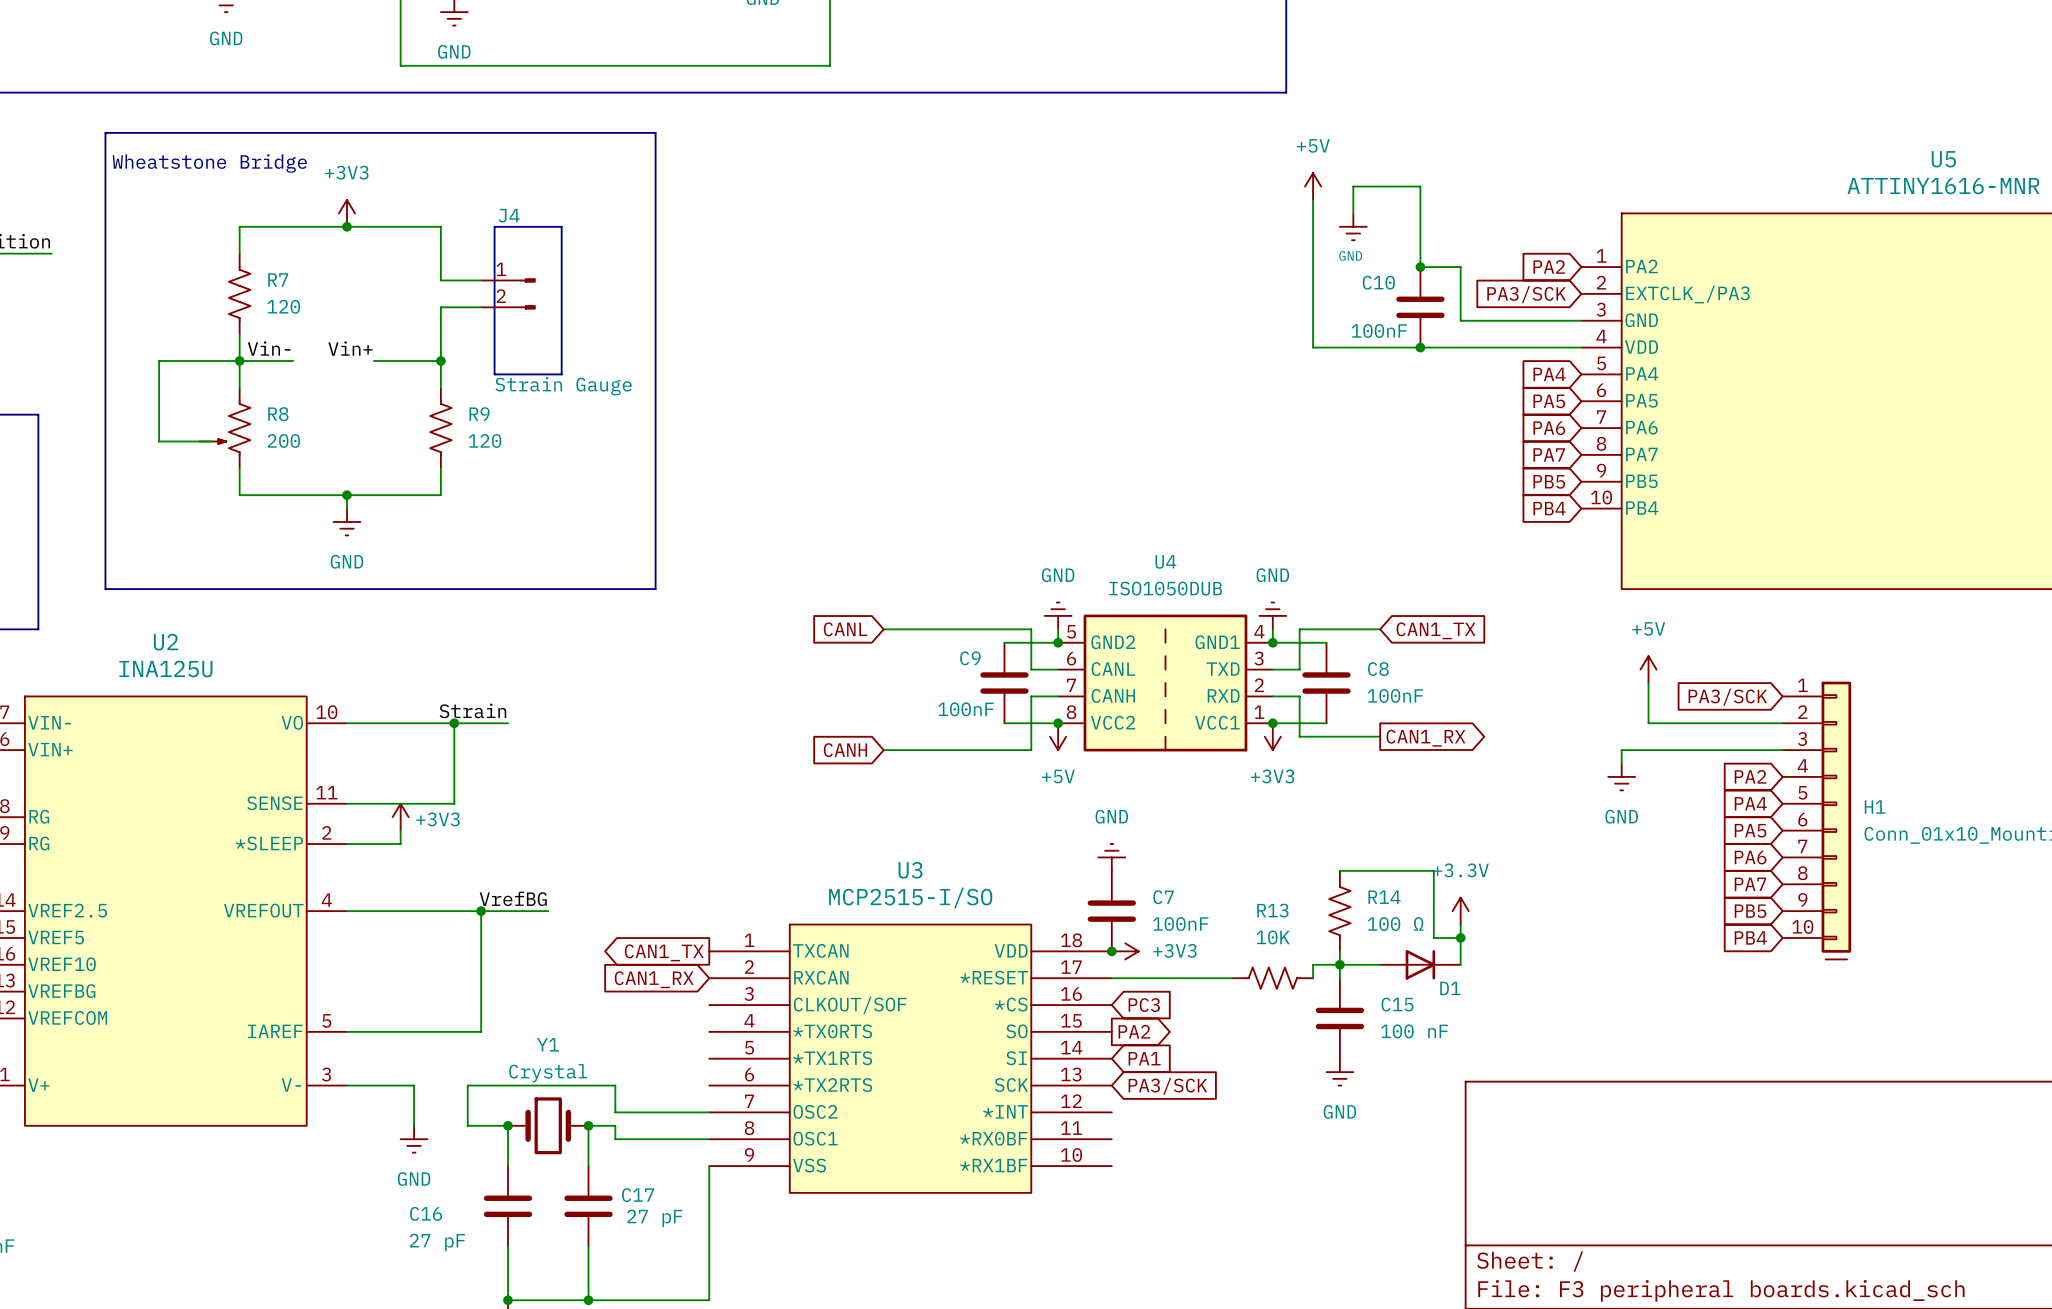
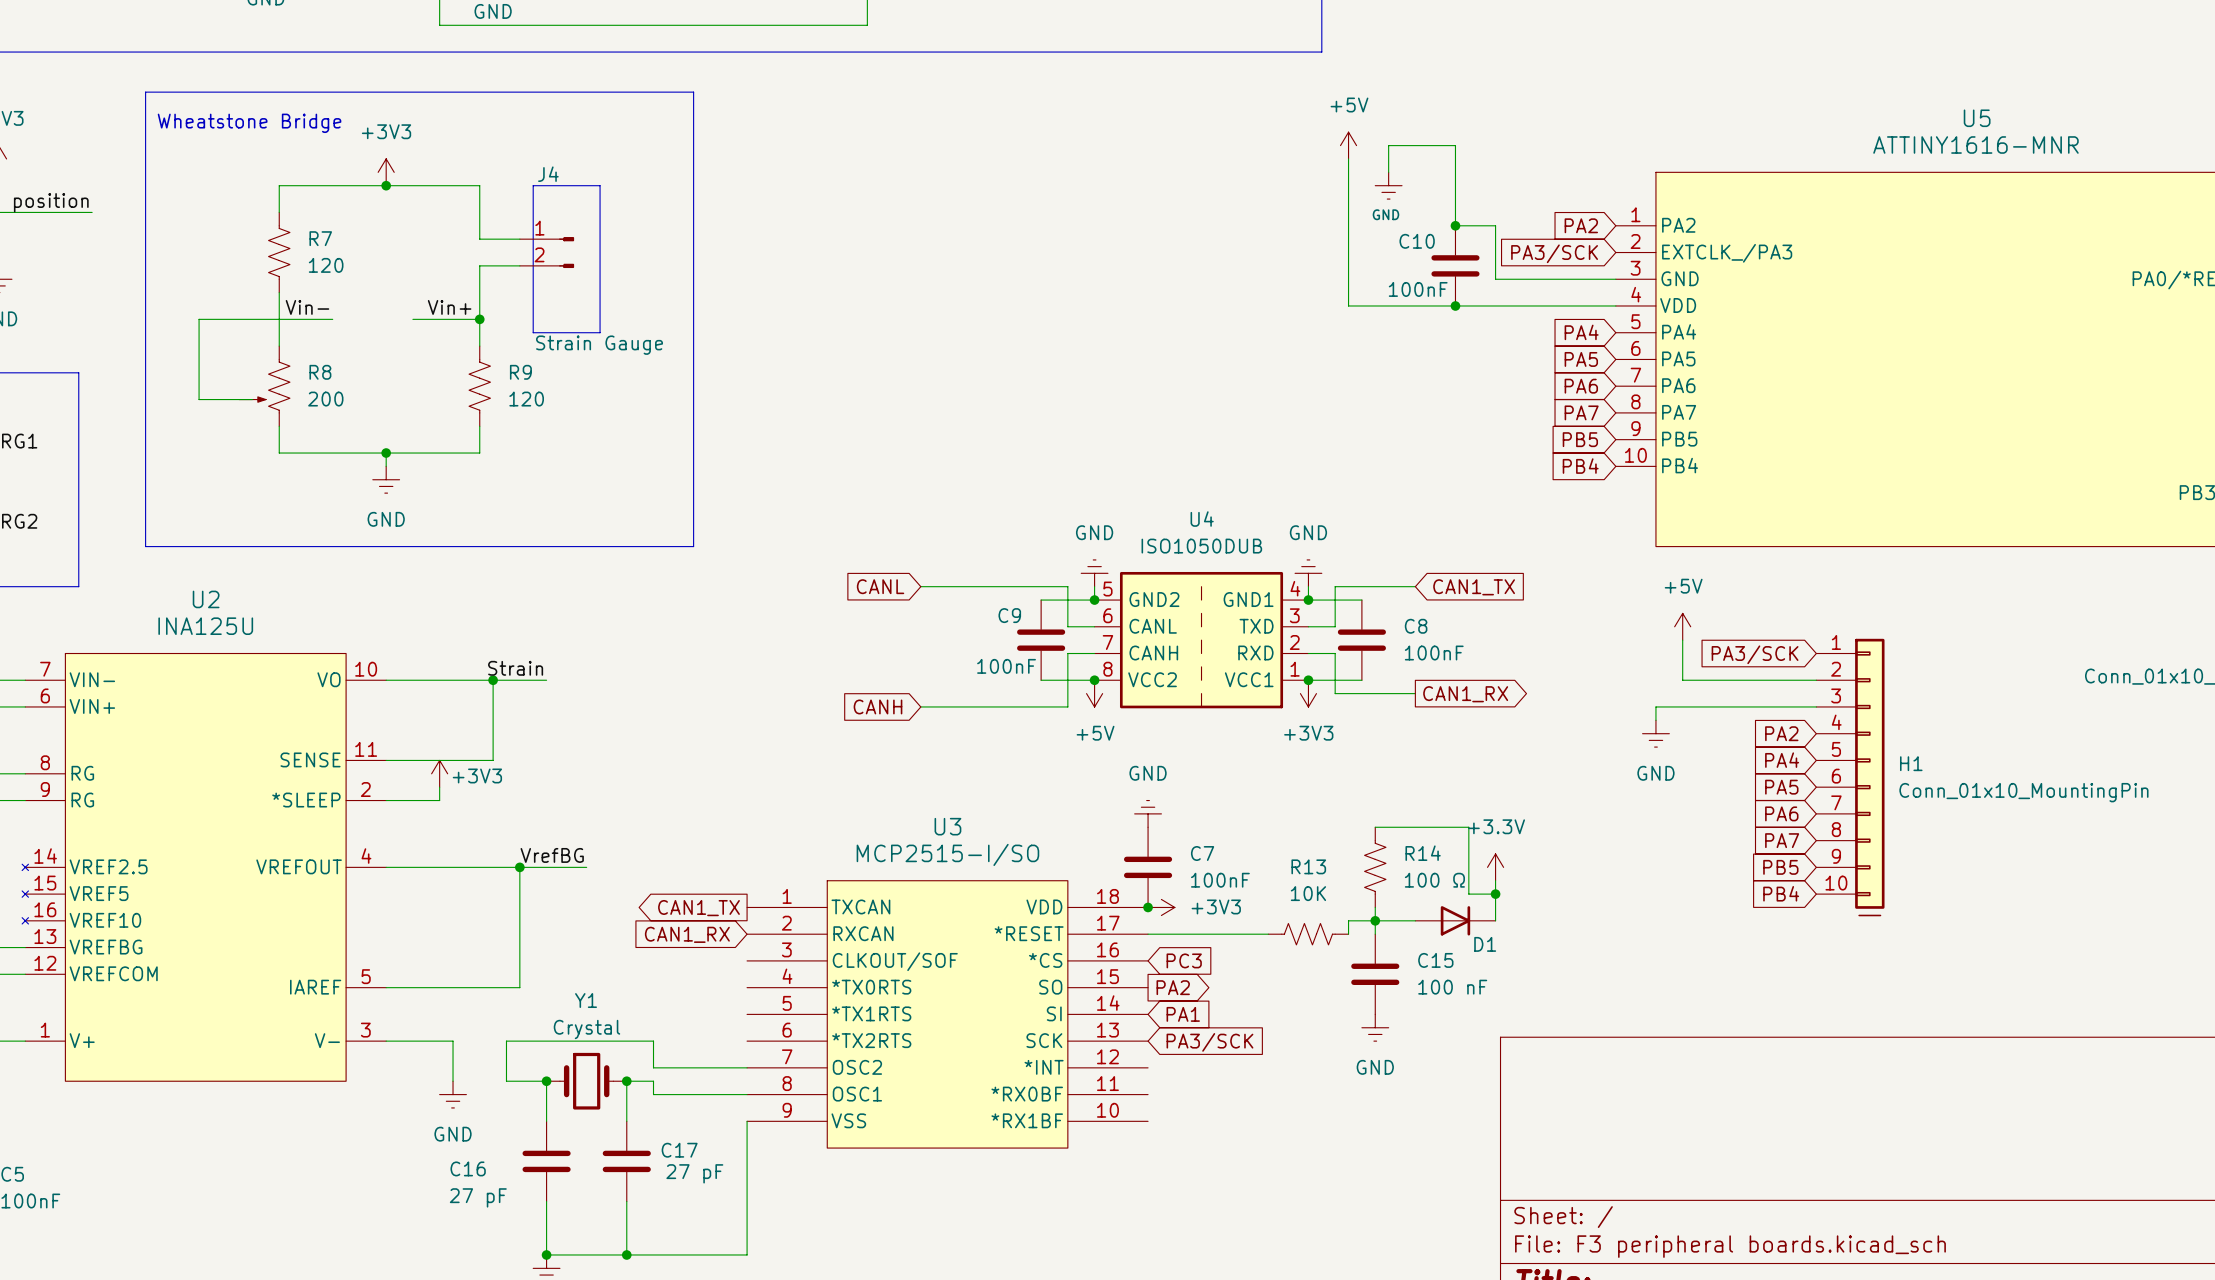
label position: Vin+ (350, 348) -> Vin+ (449, 307)
junction: (239, 360) -> none

